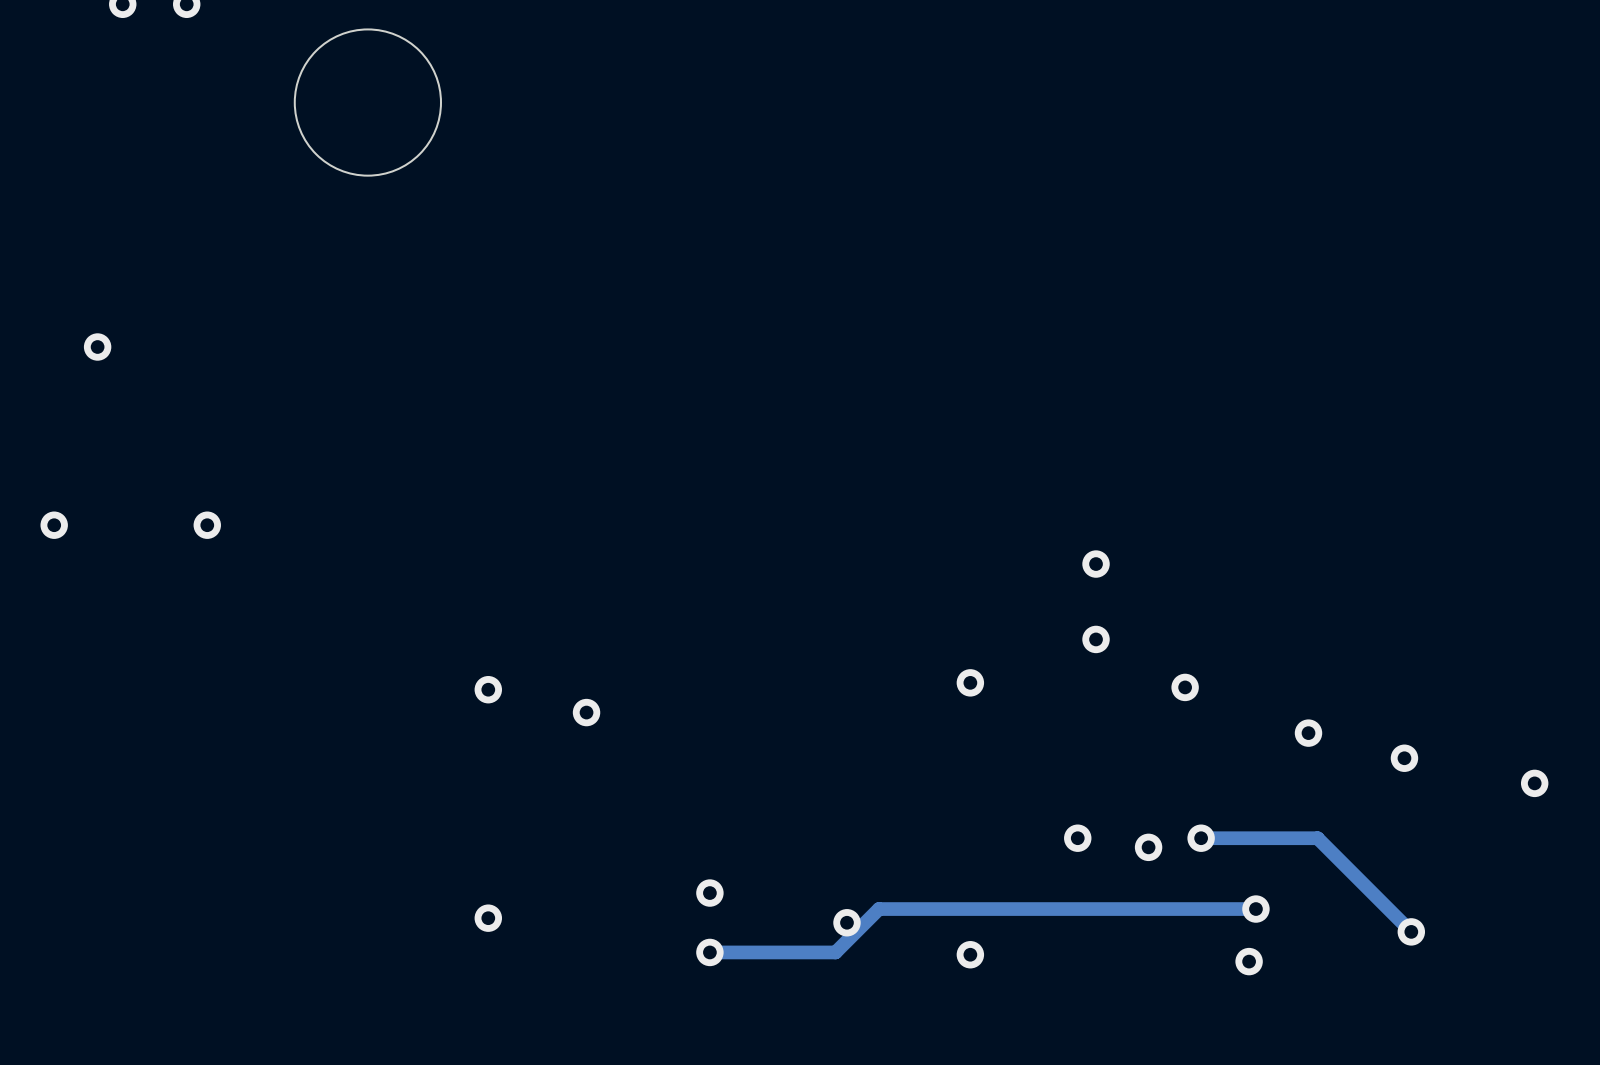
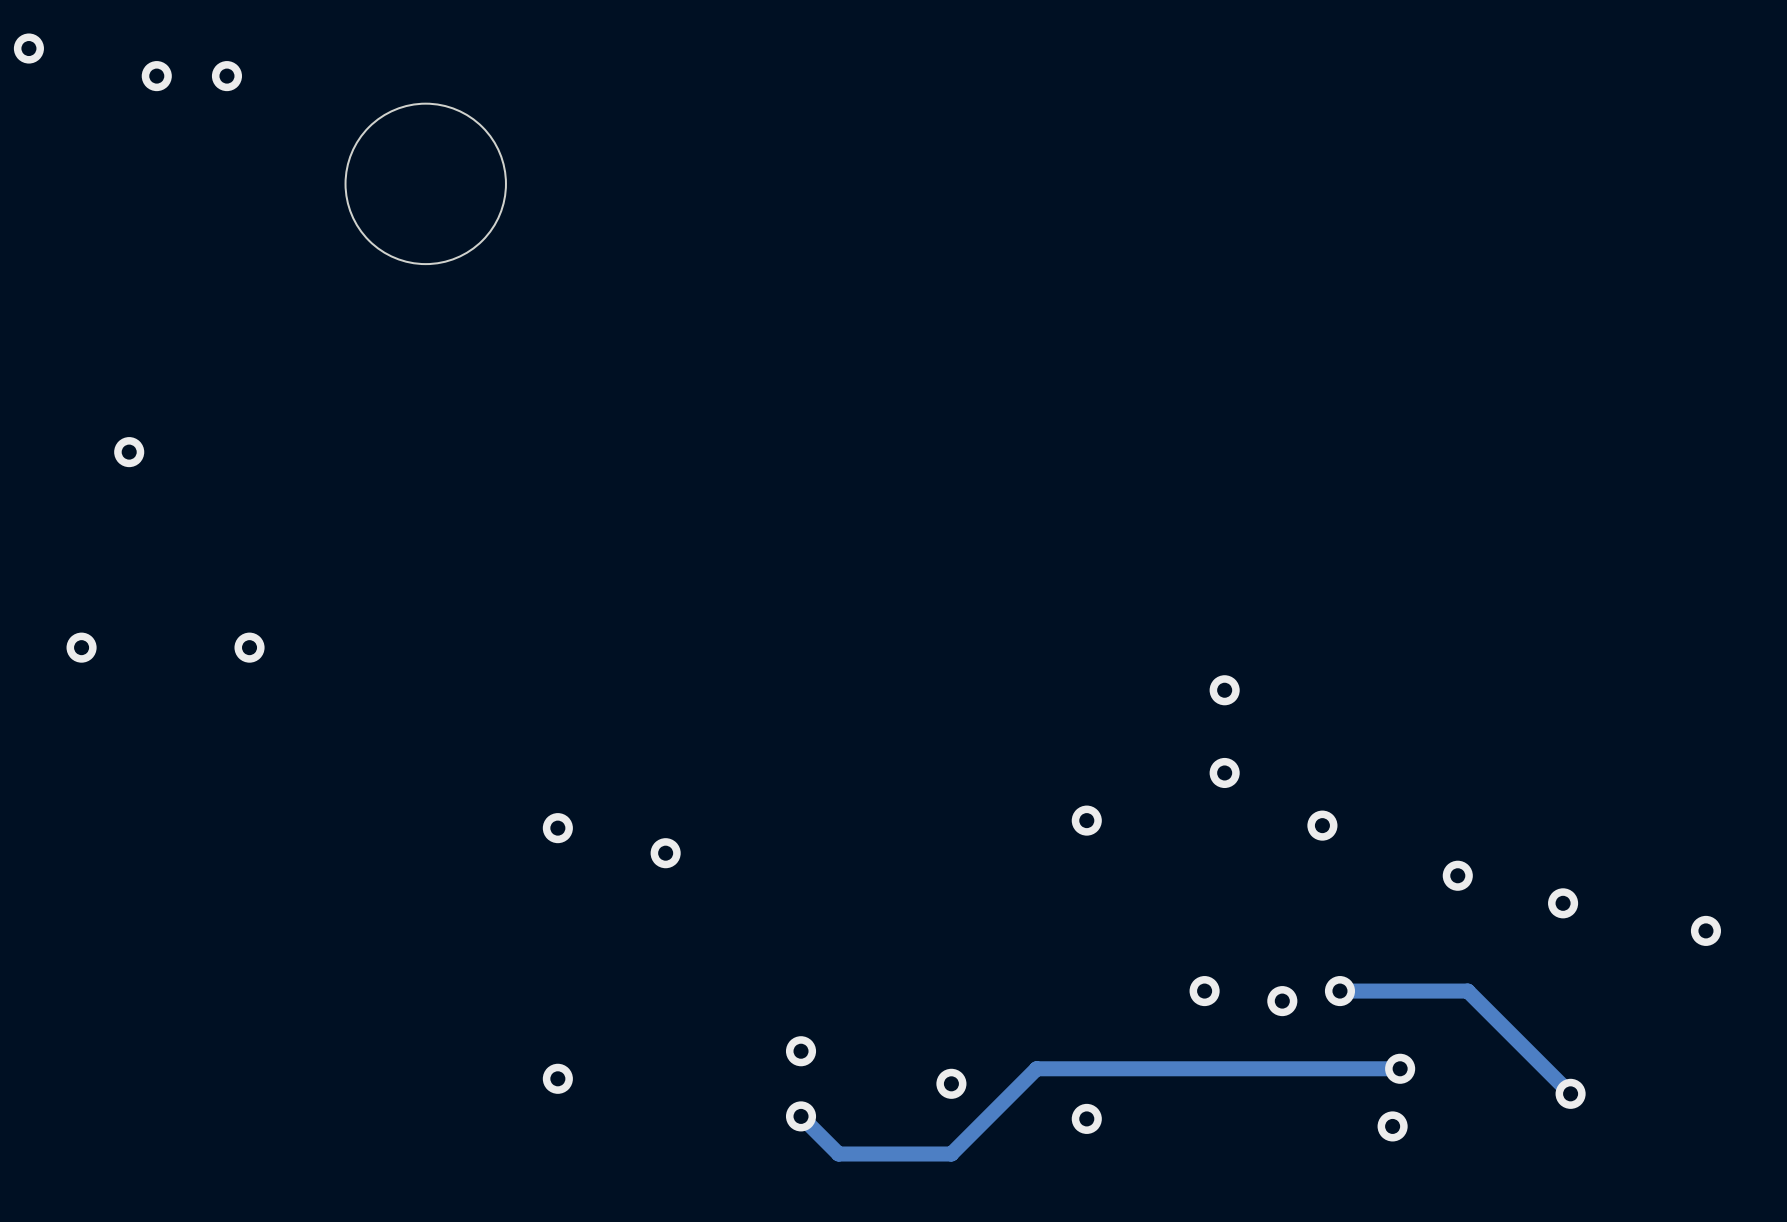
track: (924, 909) (878, 909) (835, 952) (709, 952) -> (1036, 1068) (951, 1154) (838, 1154) (801, 1116)

